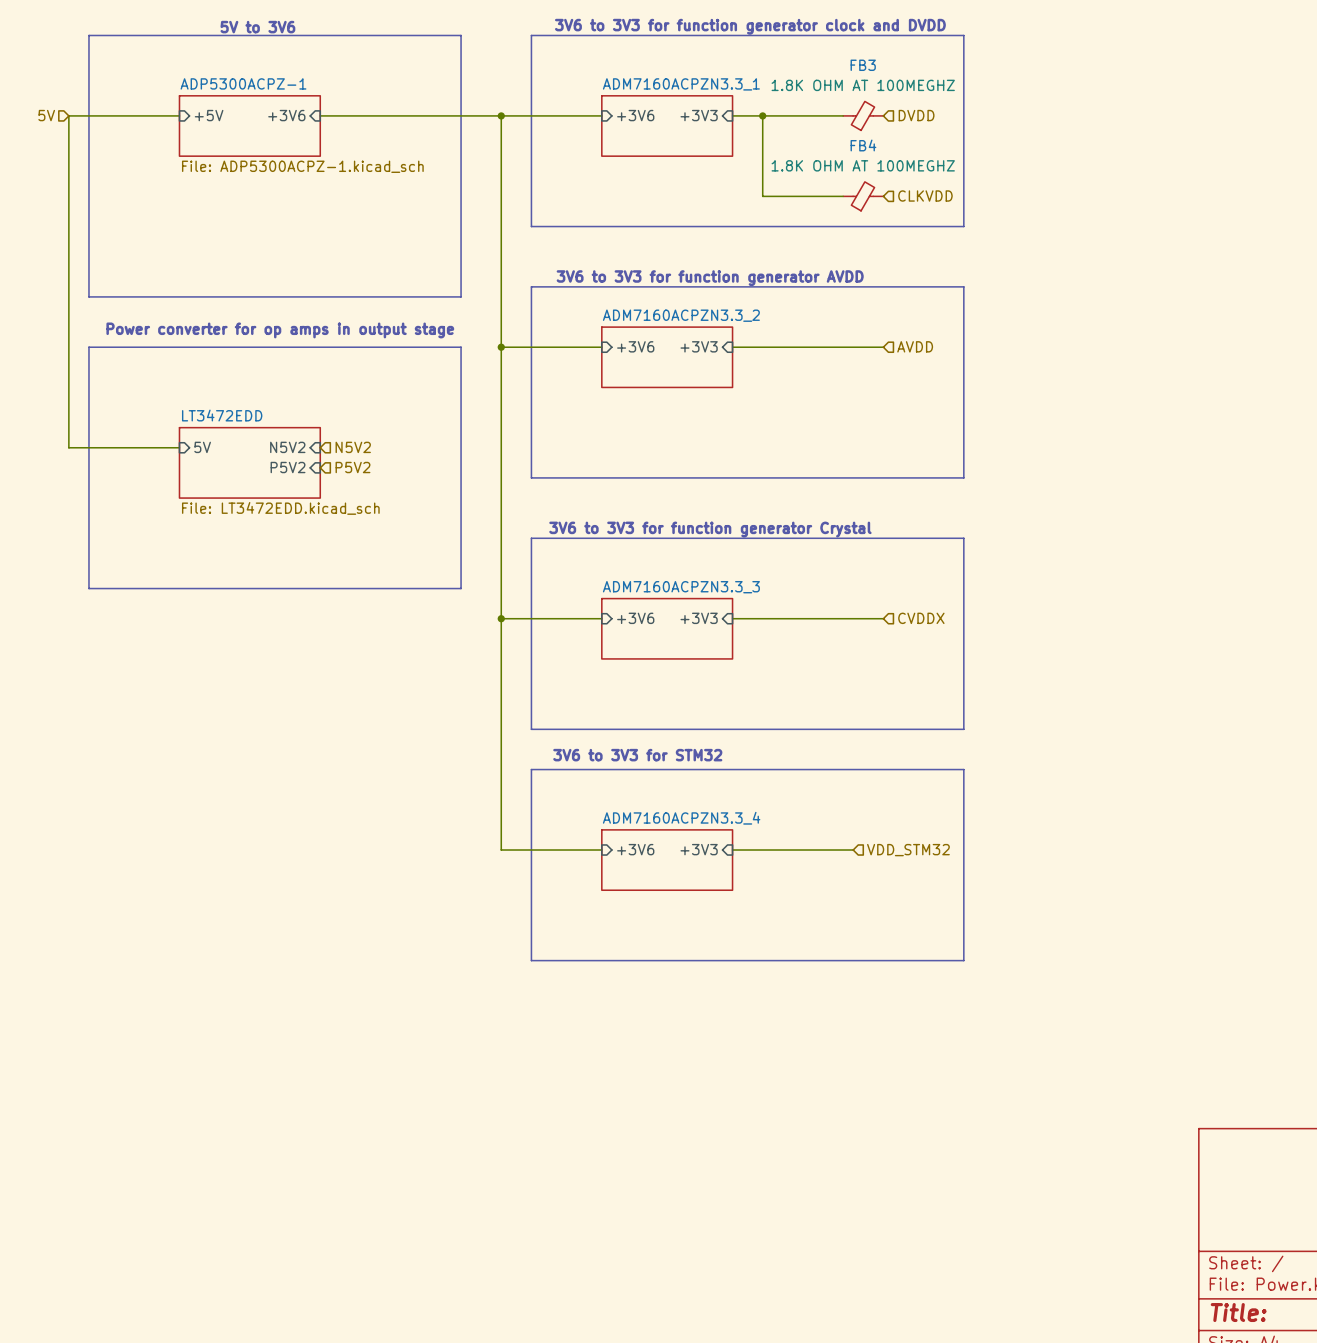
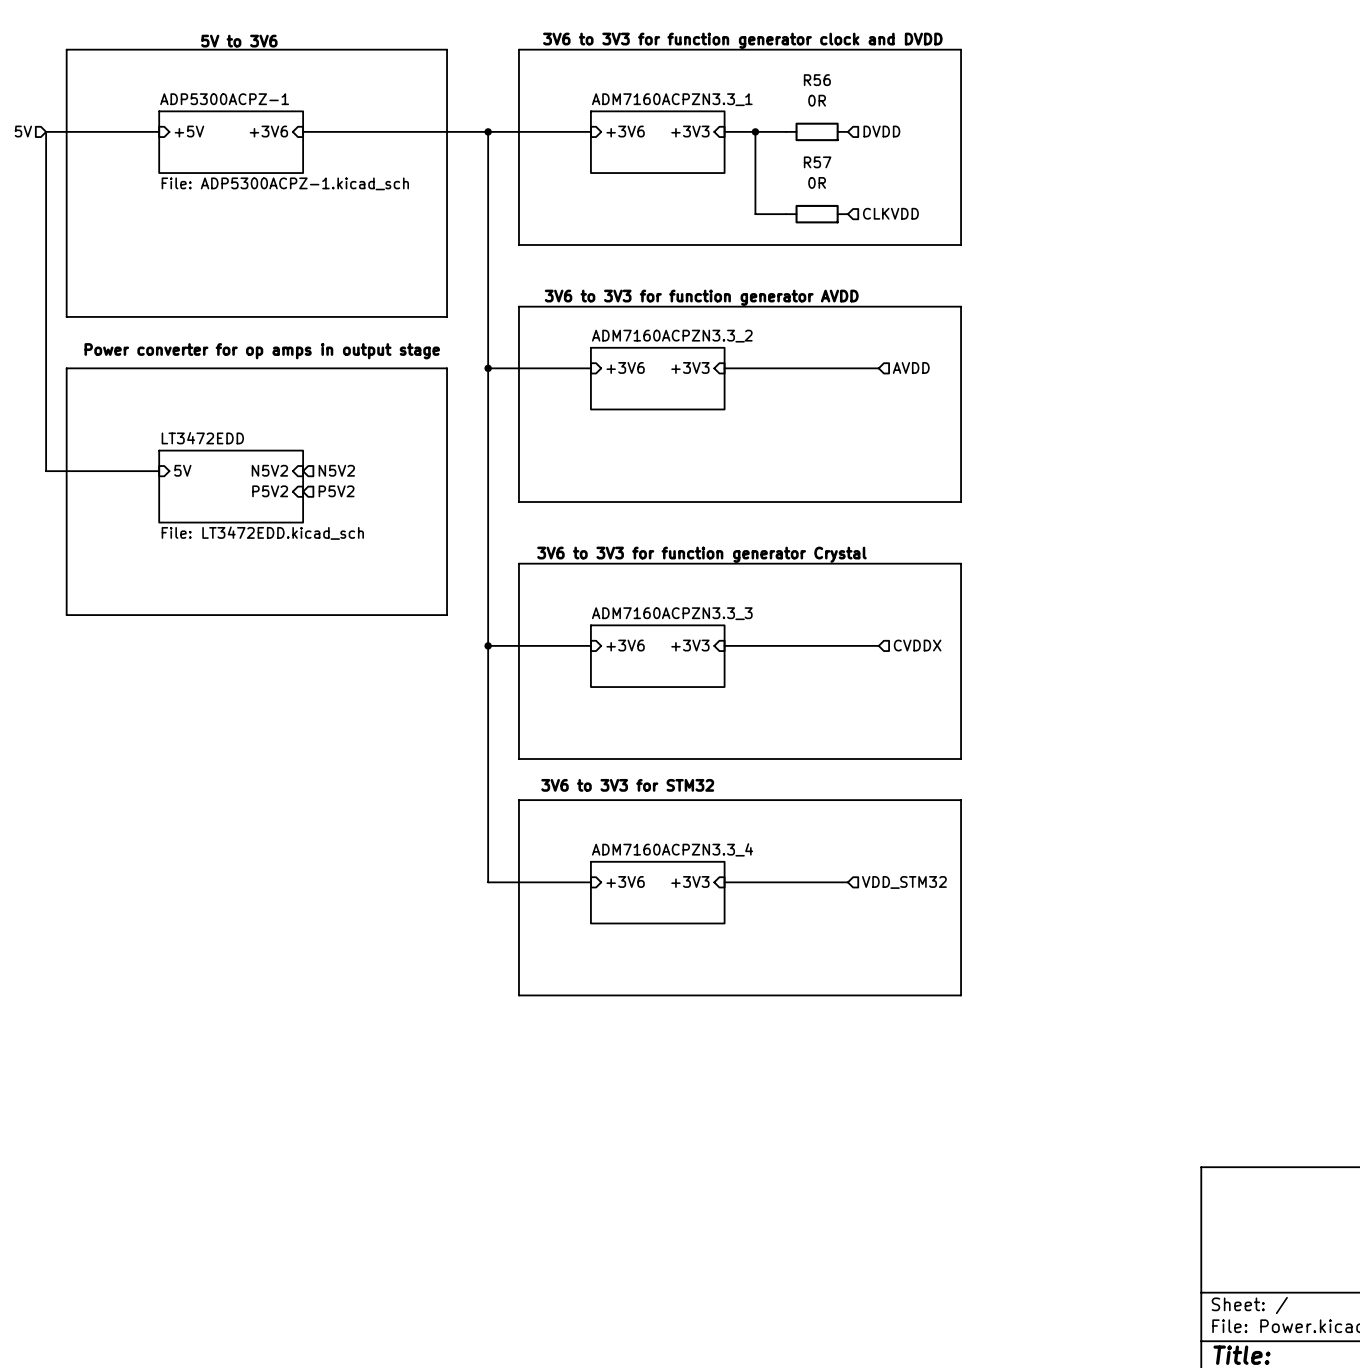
wire: (792, 115) (843, 115) -> none
R56: none -> 0R (817, 131)
FB3: 1.8K OHM AT 100MEGHZ (863, 115) -> none
hierarchical label position: DVDD (916, 115) -> DVDD (881, 131)
wire: (792, 196) (843, 196) -> none
R57: none -> 0R (817, 214)
FB4: 1.8K OHM AT 100MEGHZ (863, 196) -> none
hierarchical label position: CLKVDD (925, 196) -> CLKVDD (890, 213)

